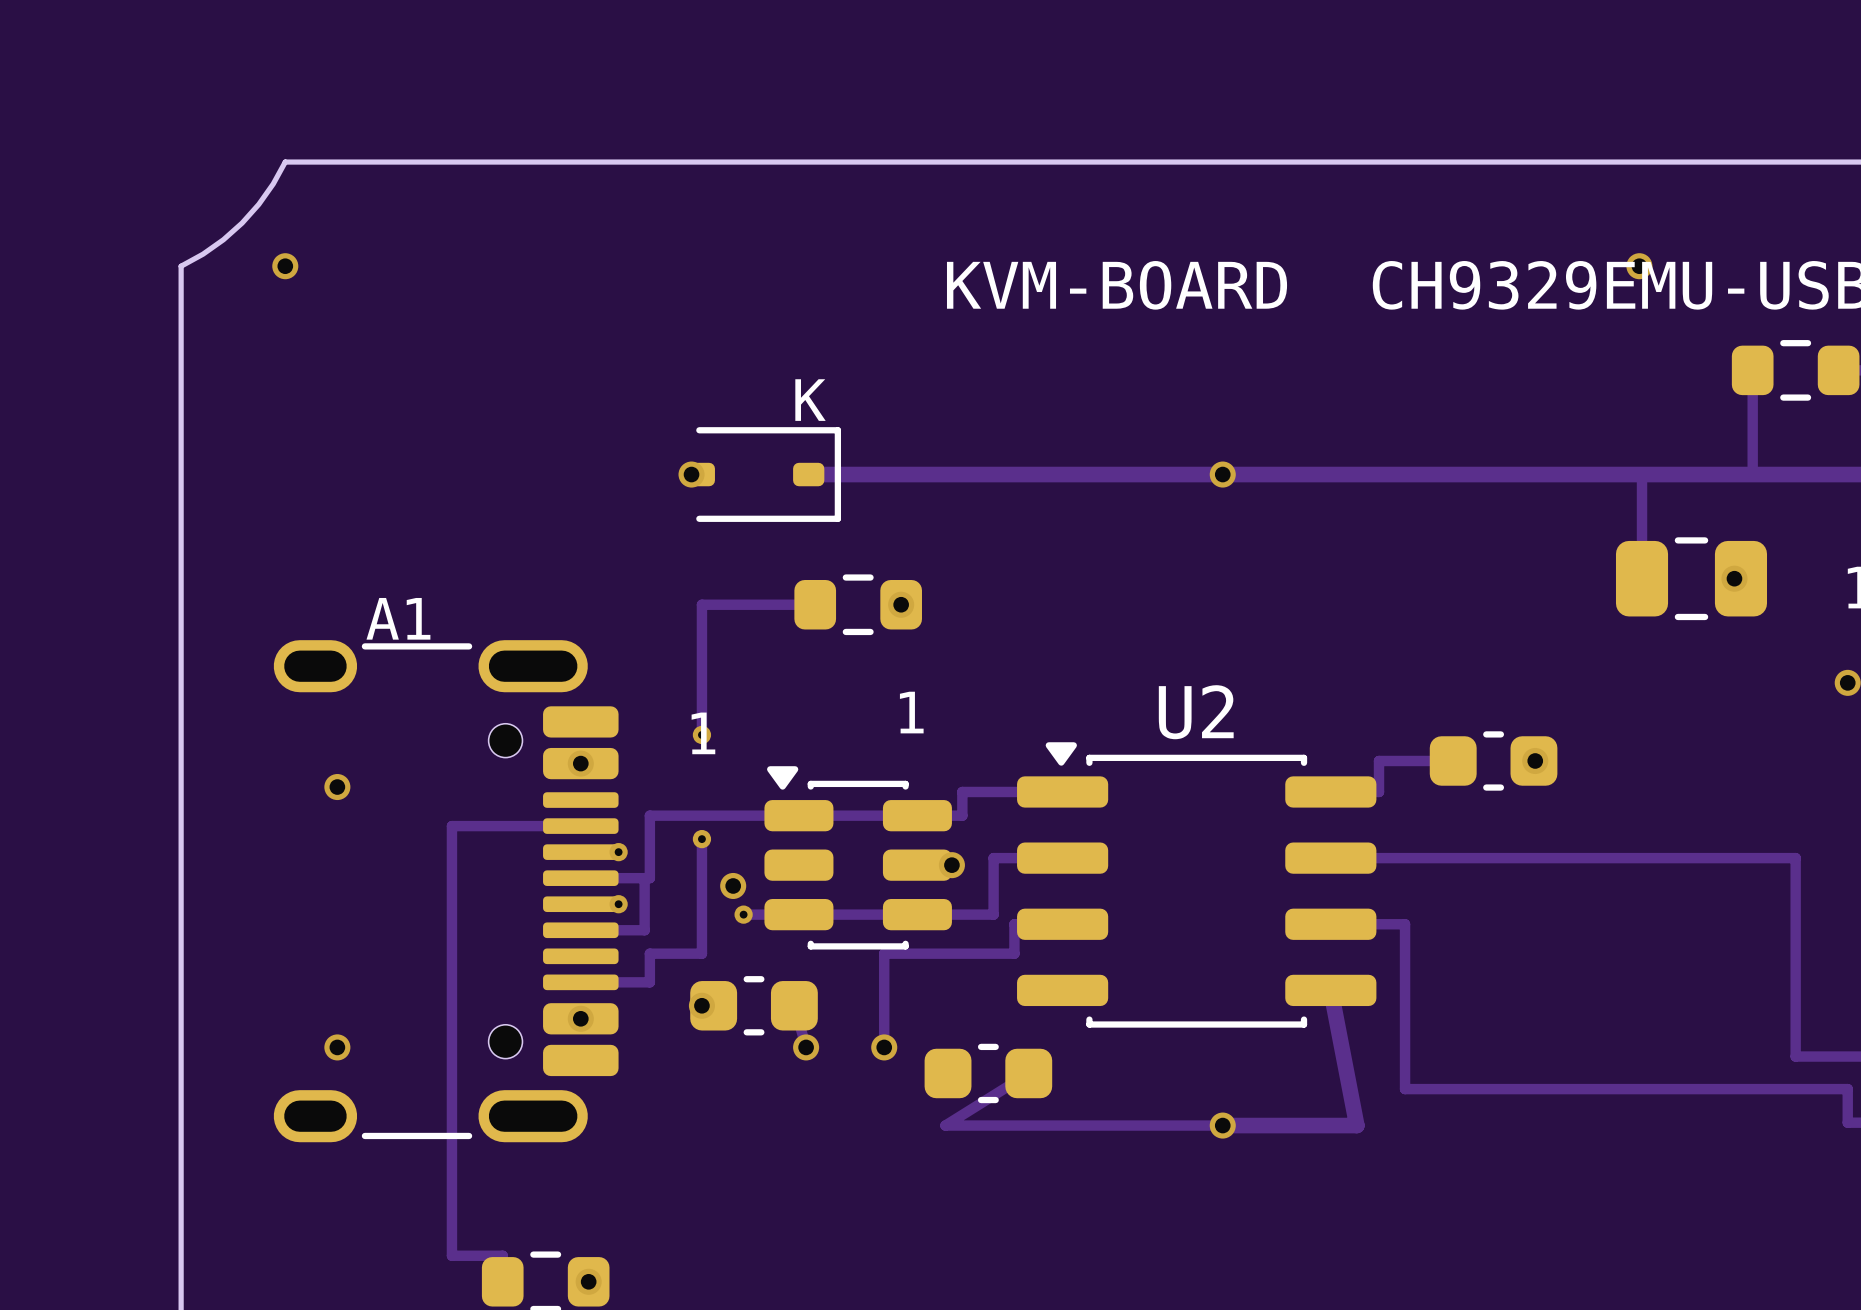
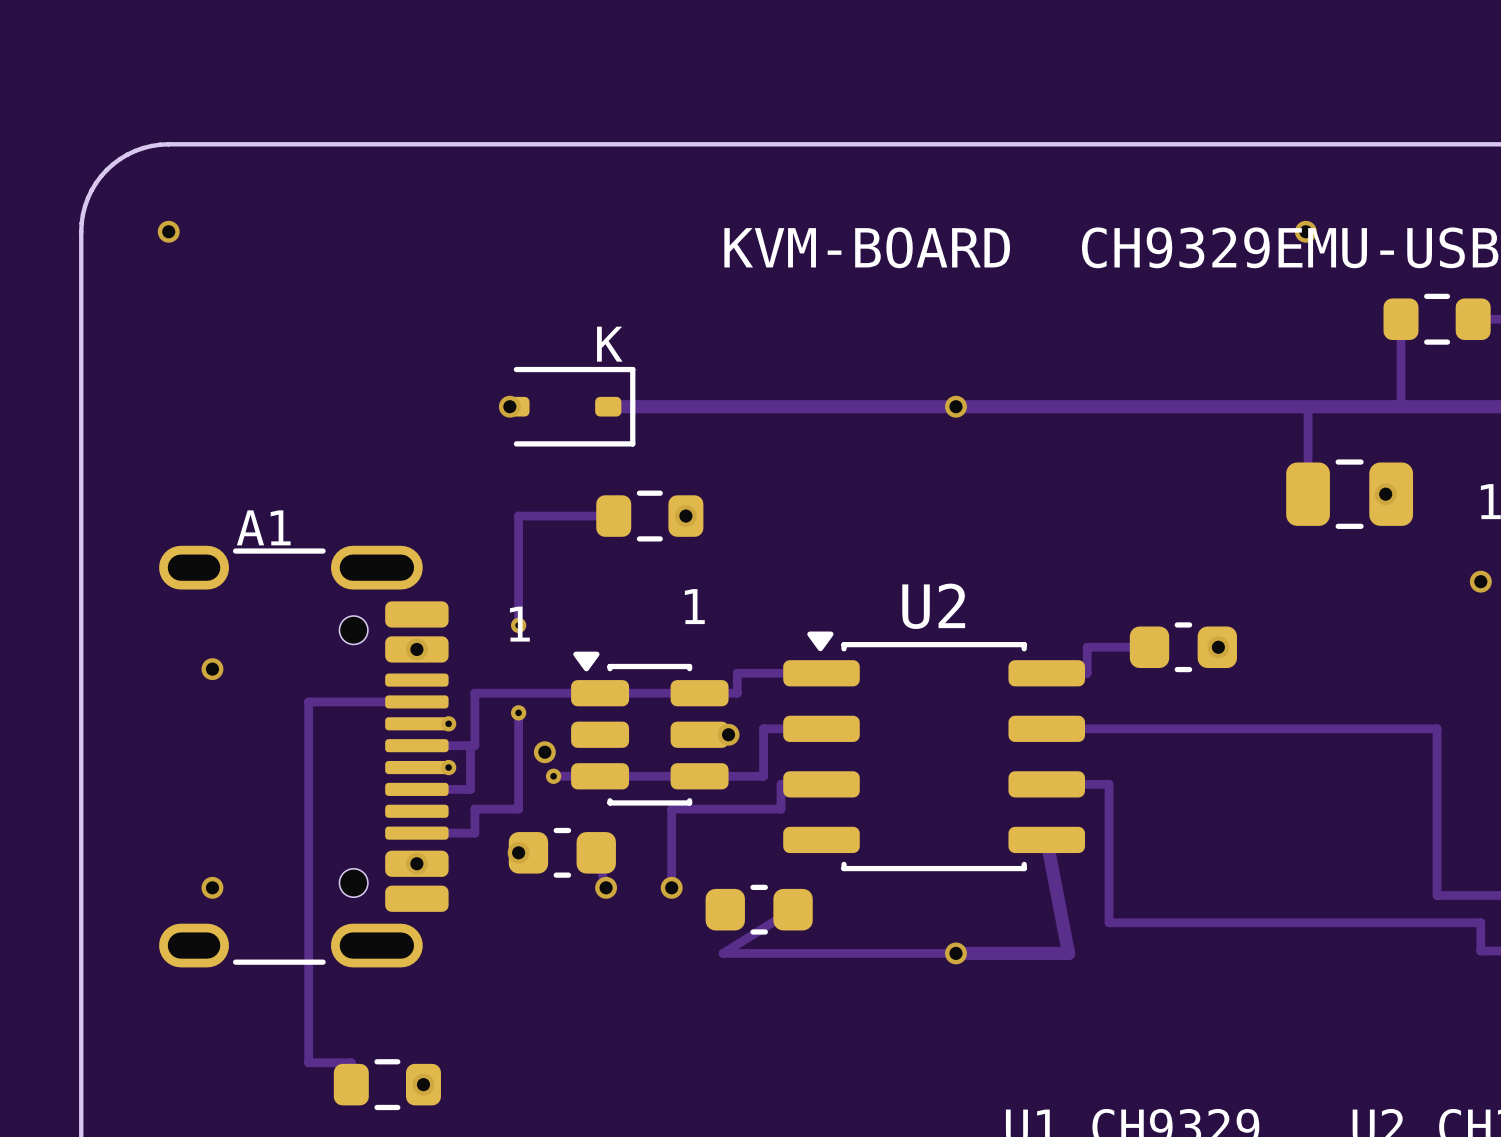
board edge: (285, 162) (273, 183) (242, 223) (203, 254) (181, 266) -> (168, 144) (151, 145) (135, 150) (120, 159) (106, 169) (95, 183) (87, 198) (82, 214) (81, 231)

